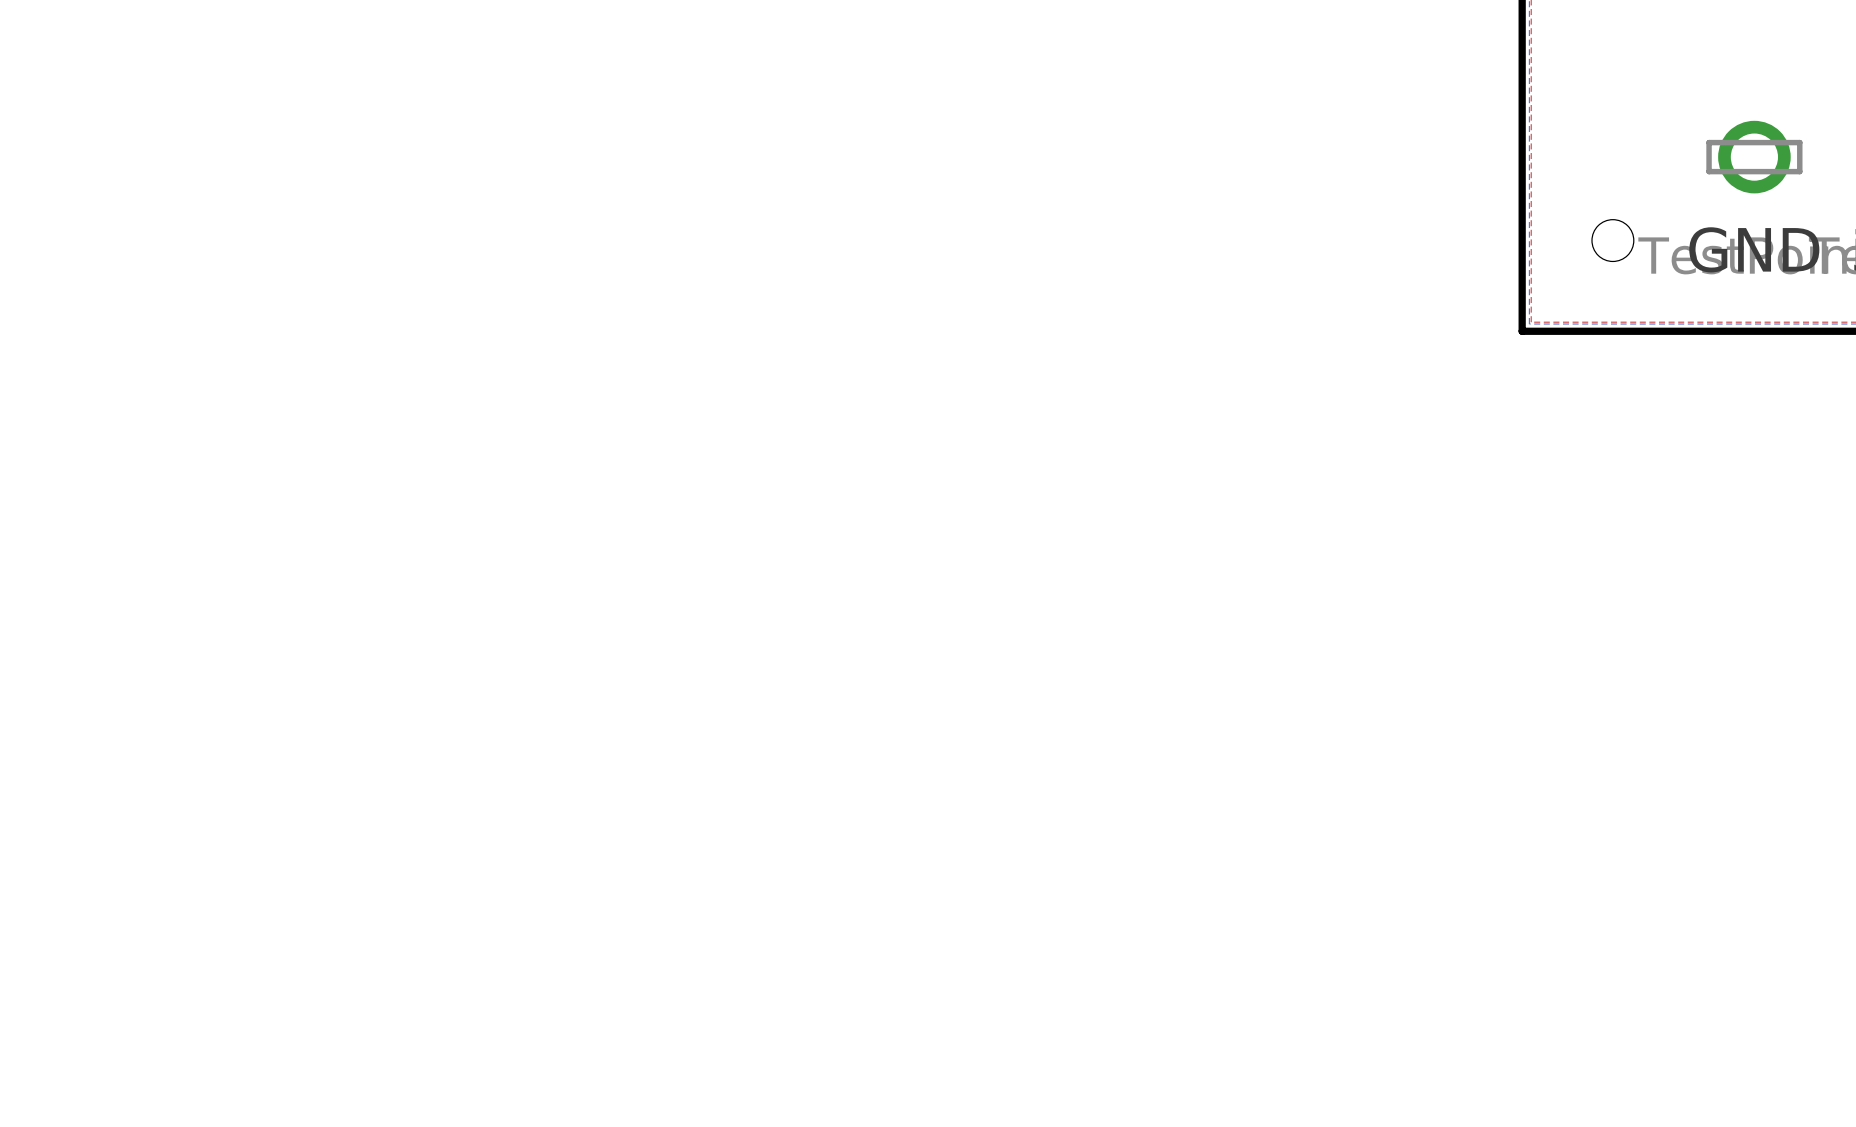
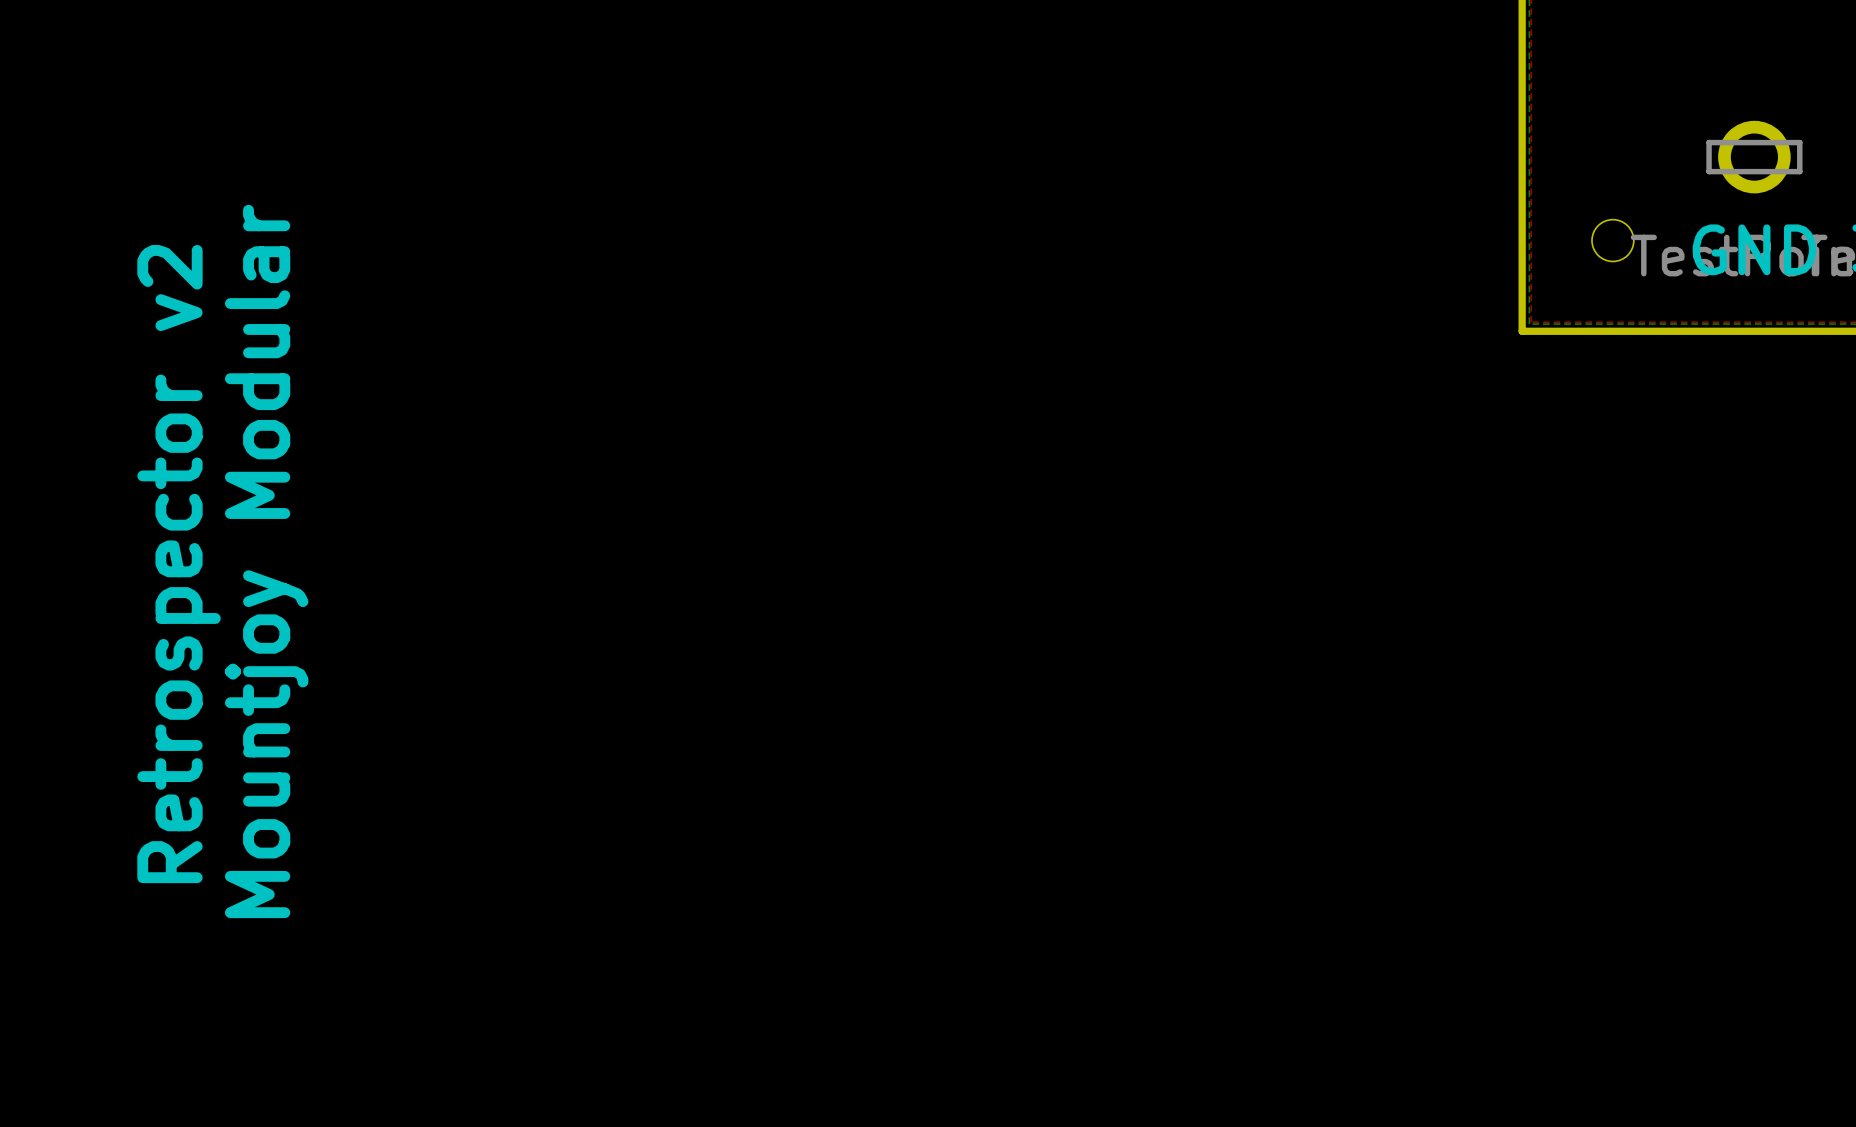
text: none -> Mountjoy Modular (266, 561)
text: none -> Retrospector v2 (179, 564)

